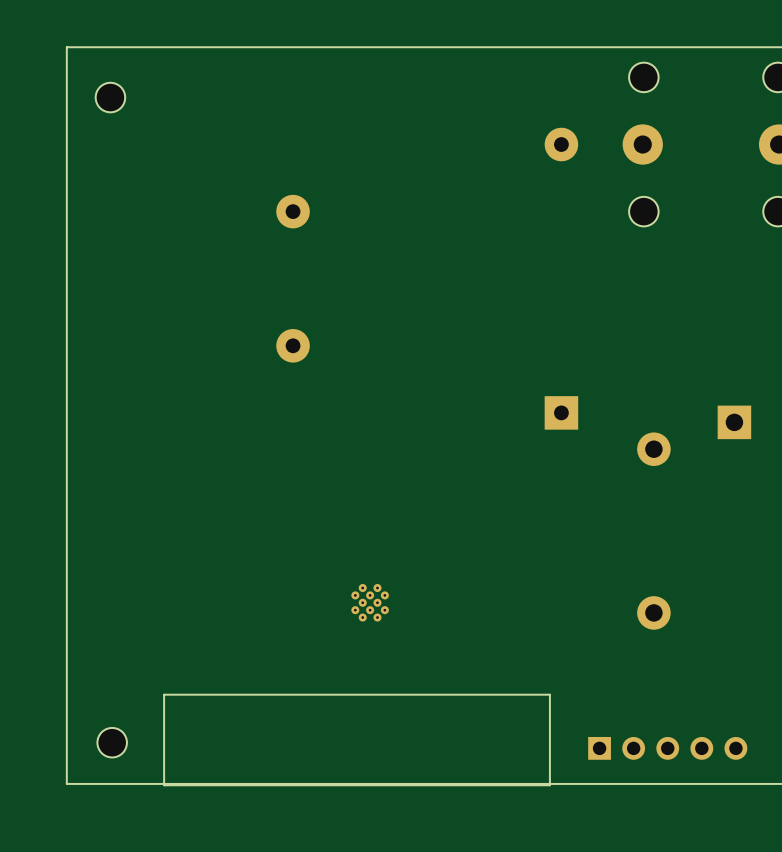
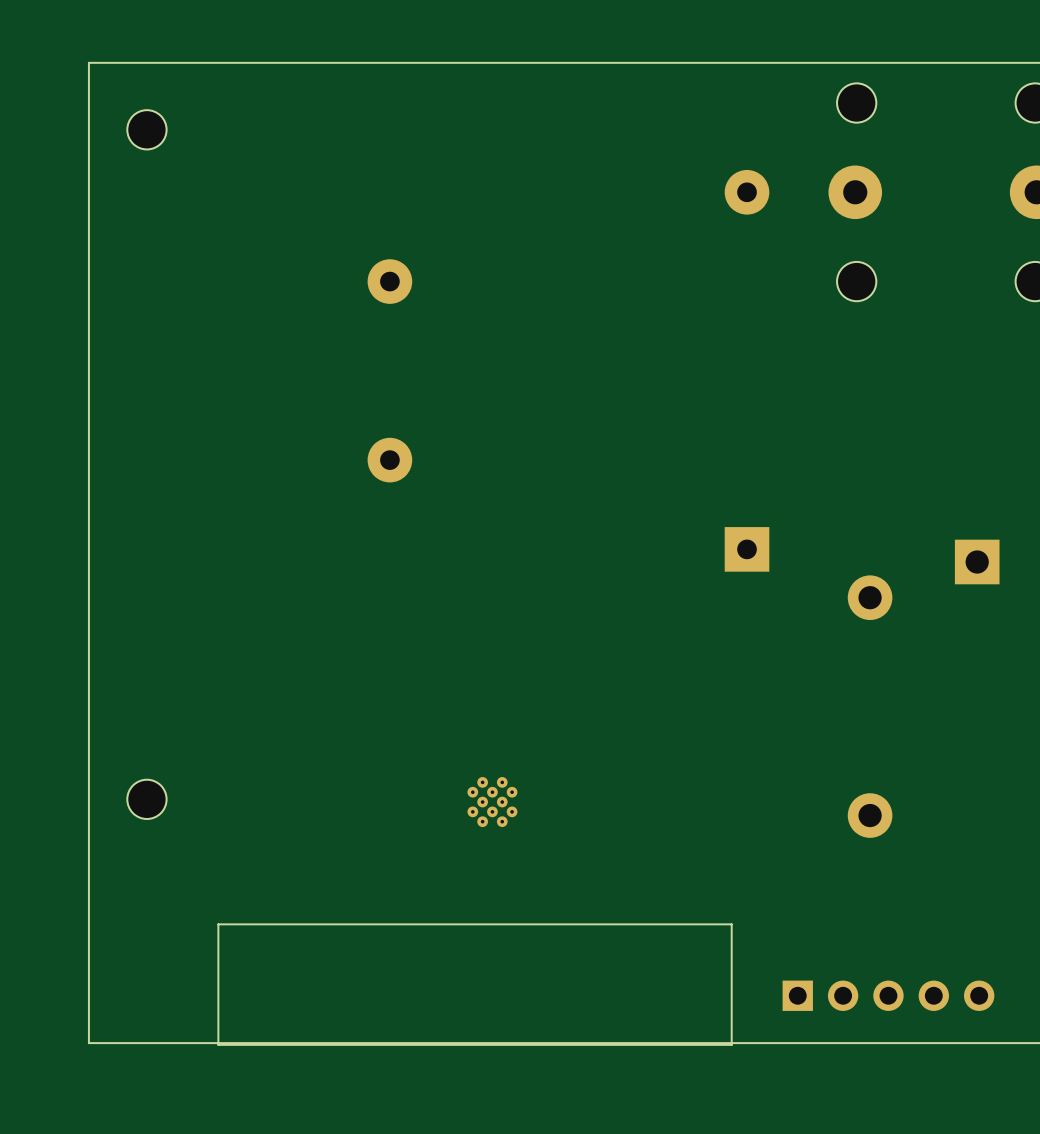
part position: (112, 742) -> (146, 799)

